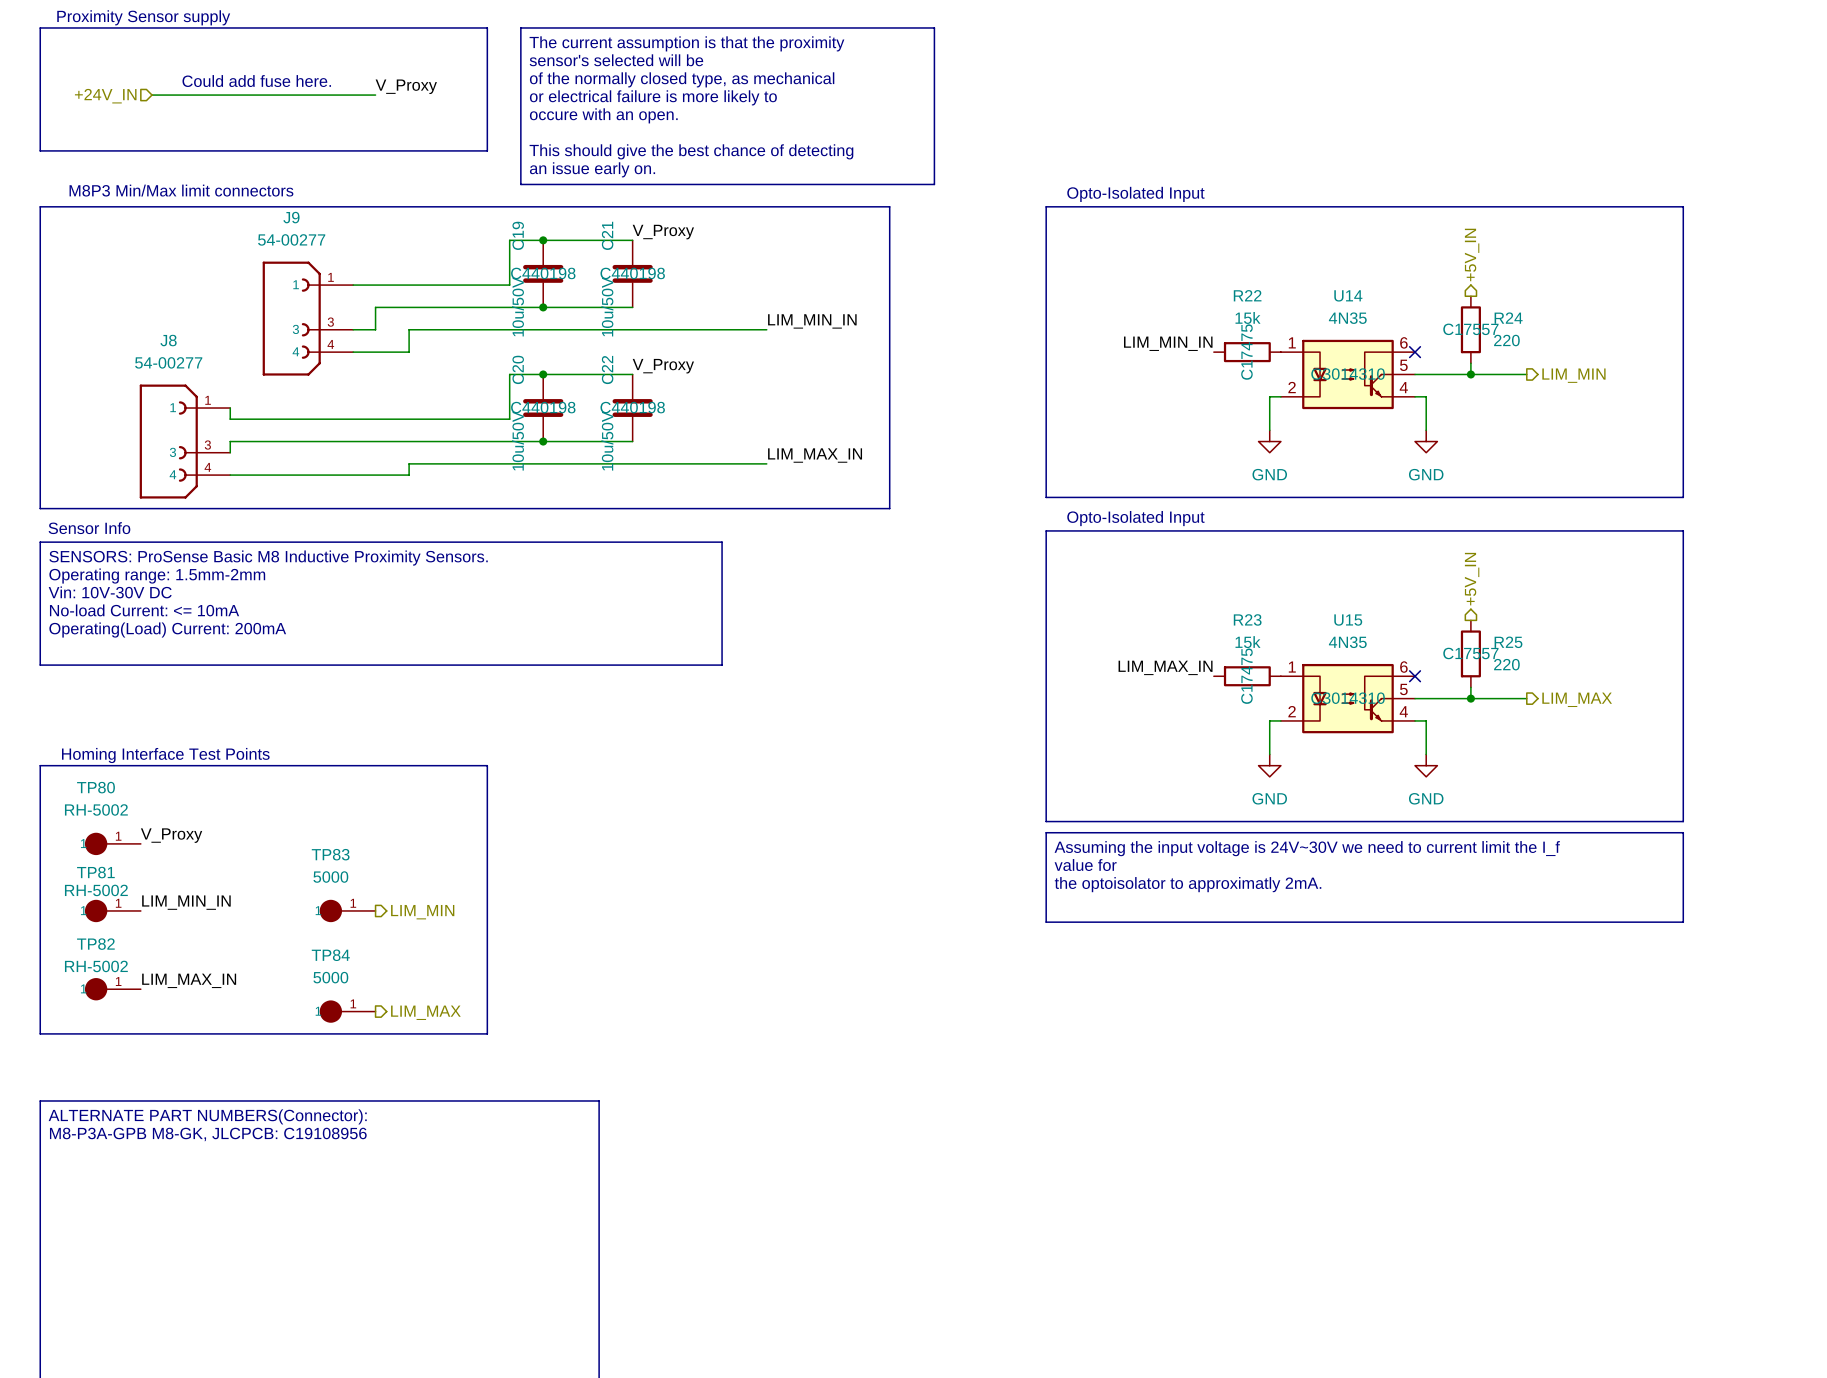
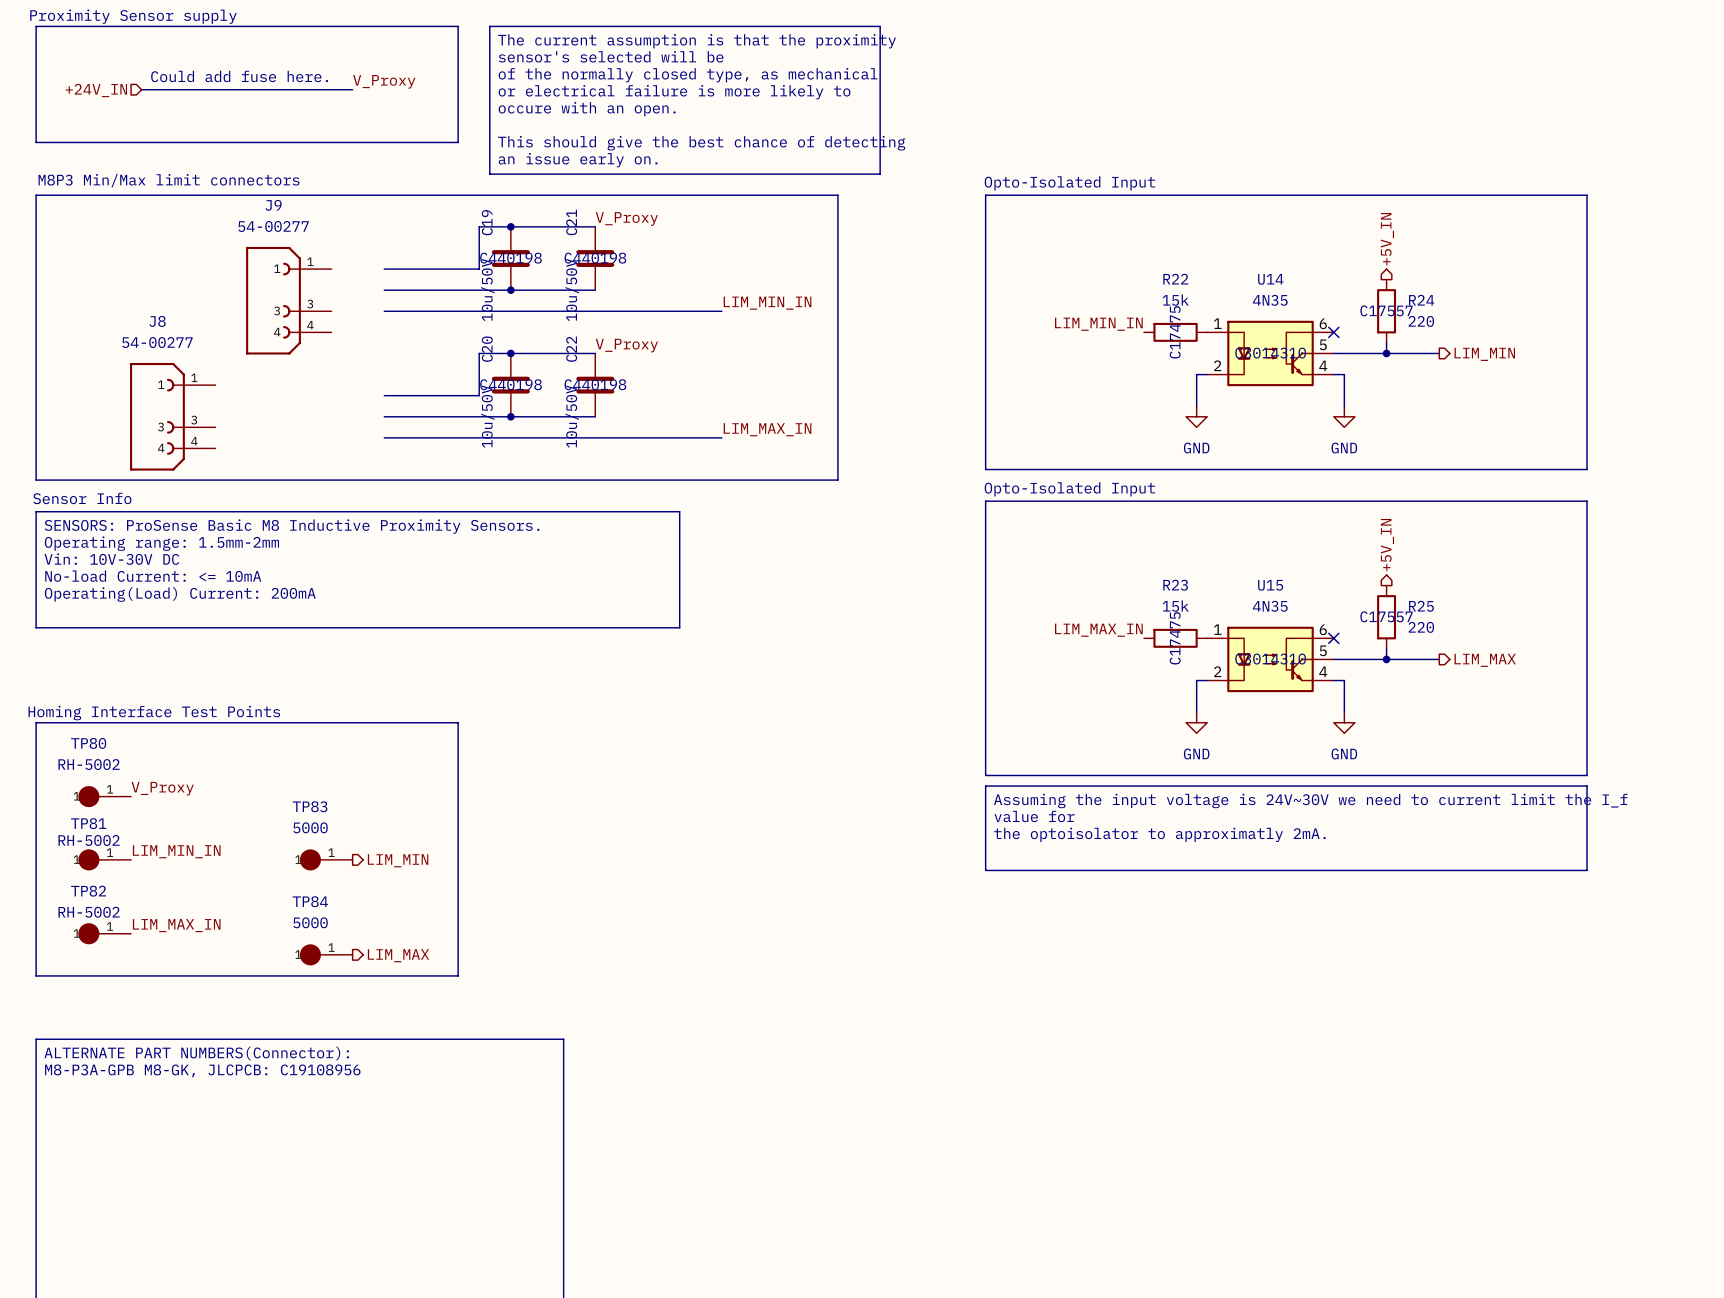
wire: (353, 285) (409, 285) -> none
wire: (409, 307) (375, 307) (375, 329) (353, 329) -> none
wire: (409, 329) (409, 352) (353, 352) -> none
wire: (230, 408) (230, 419) (409, 419) -> none
wire: (409, 441) (230, 441) (230, 452) -> none
wire: (409, 463) (409, 475) (230, 475) -> none

